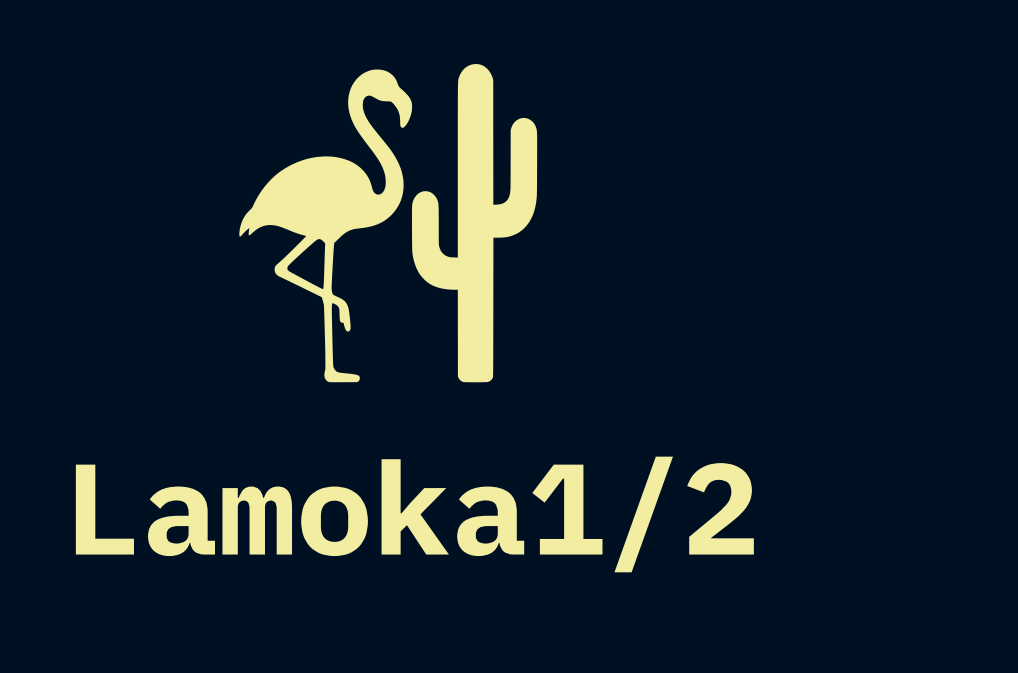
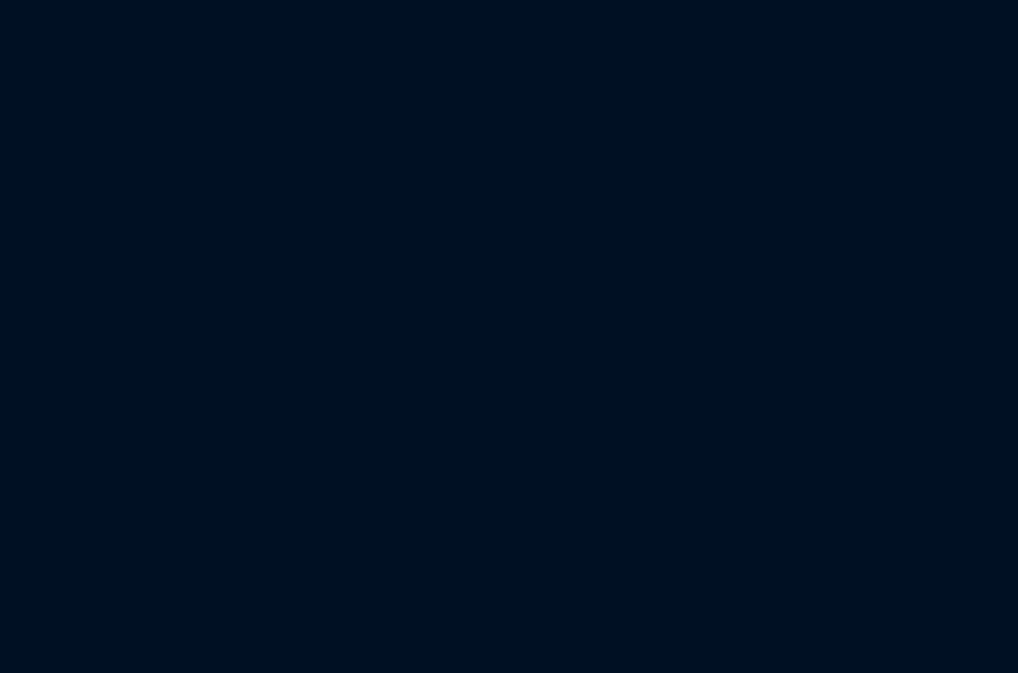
drawing: [239, 64, 538, 383] -> none
text: Lamoka1/2 (414, 514) -> none

